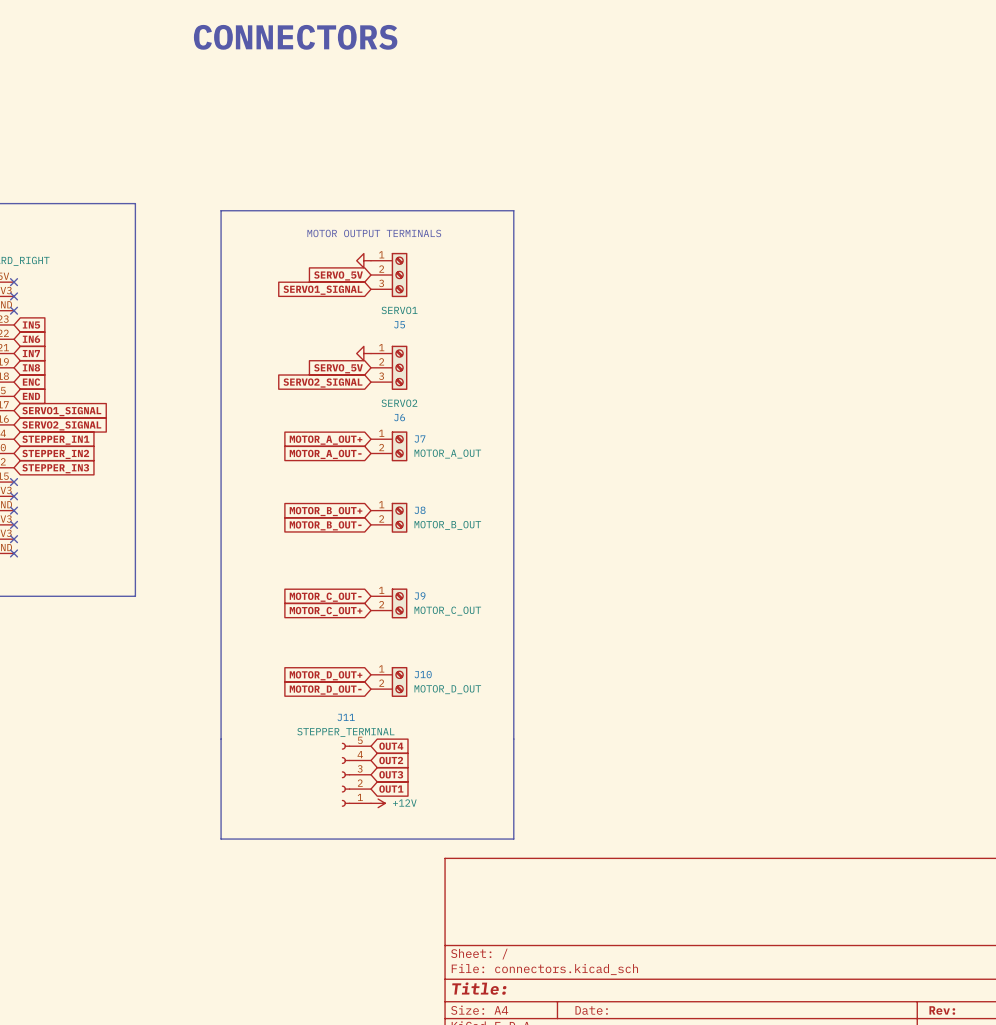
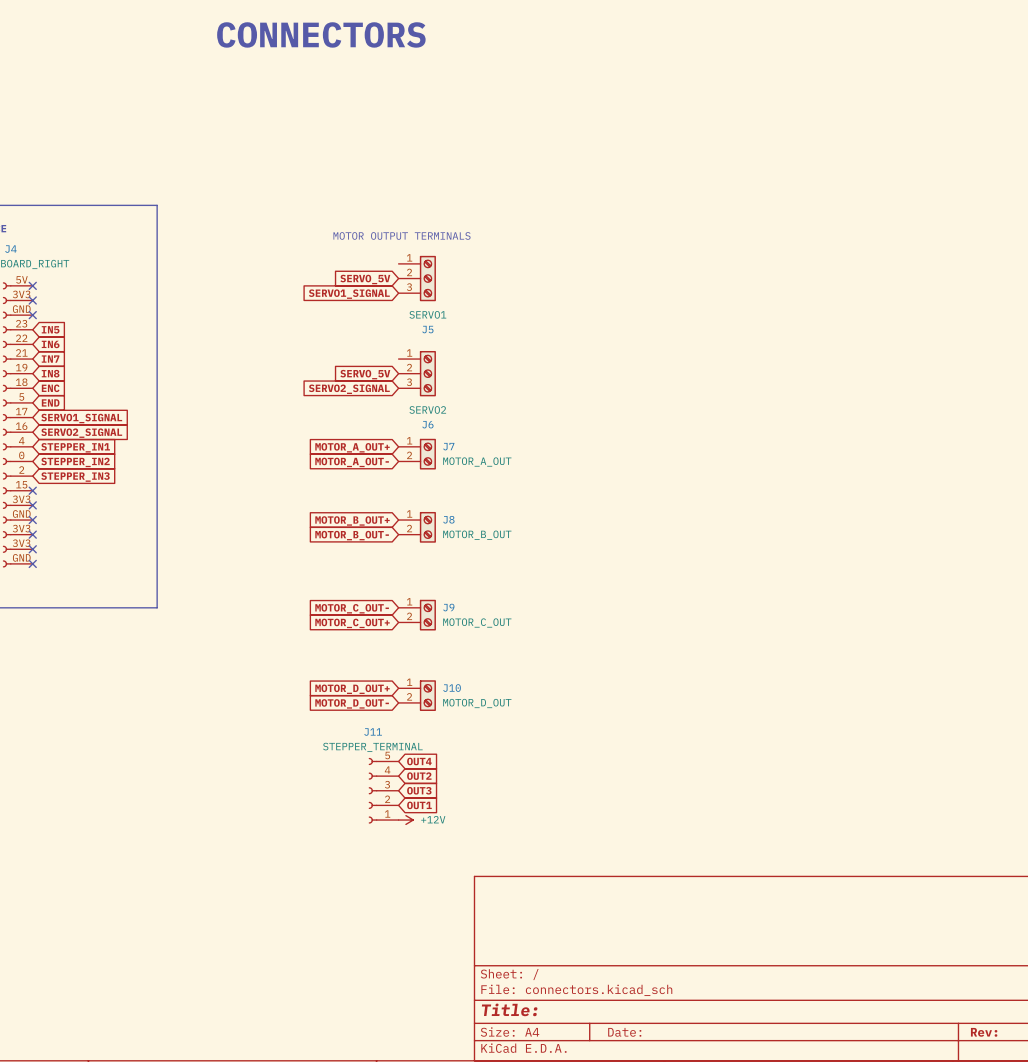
line: (221, 210) (513, 210) (513, 839) (221, 839) (221, 210) -> none
power symbol: (363, 260) -> none
power symbol: (363, 353) -> none

